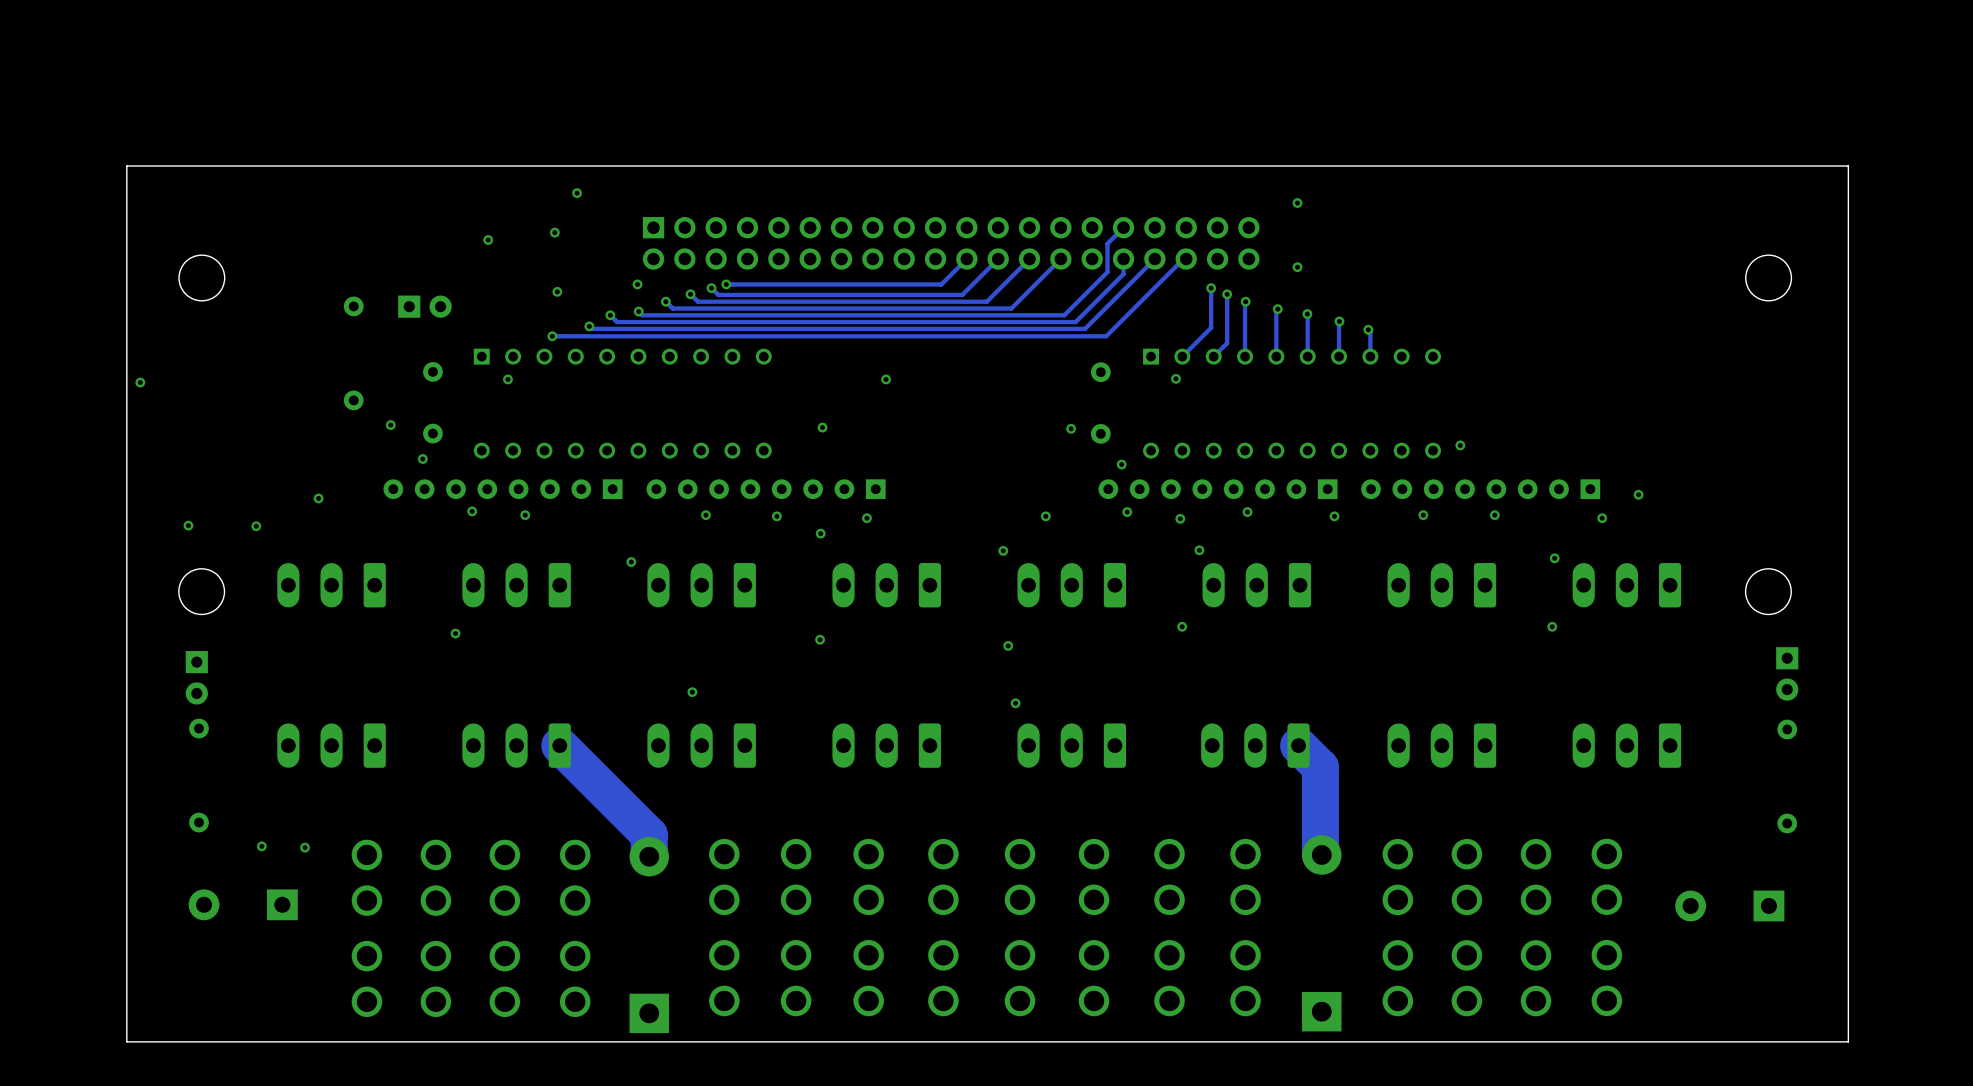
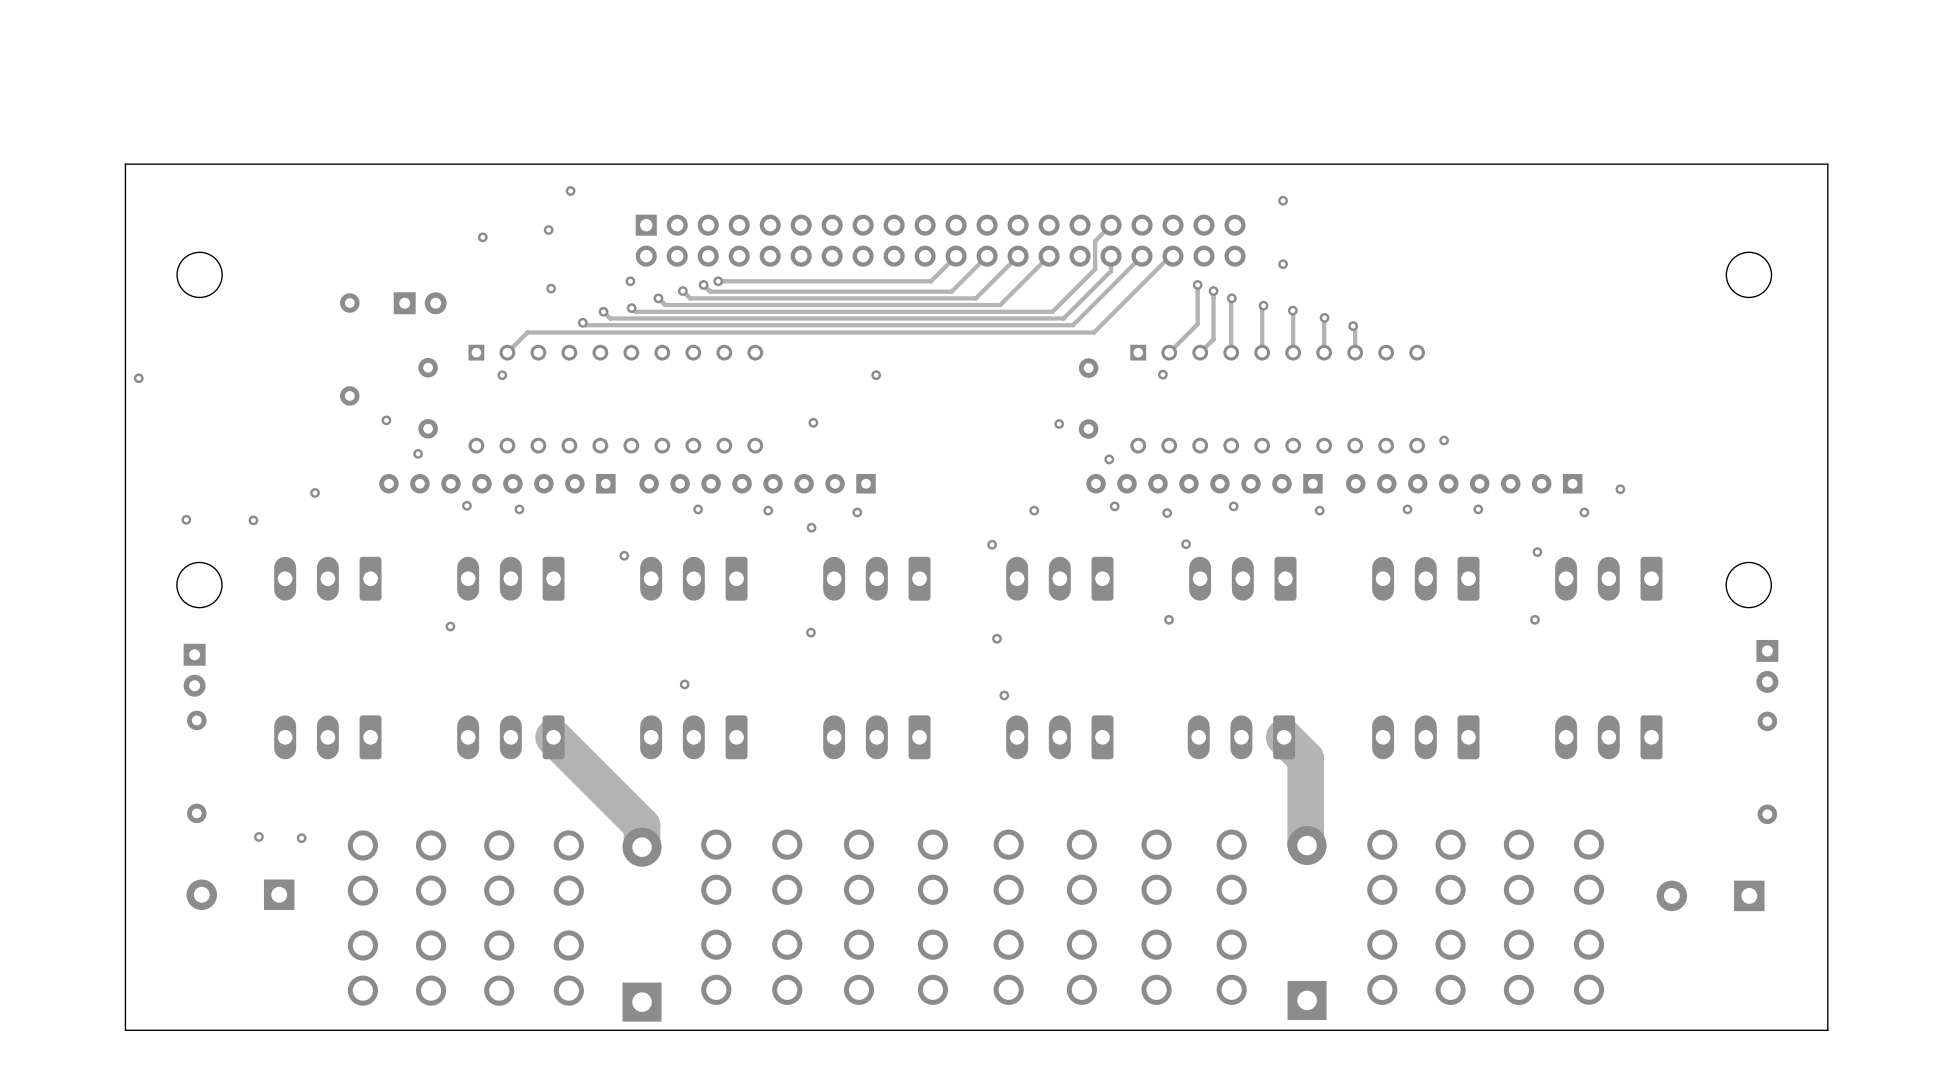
track: none -> (546, 332) (527, 332) (507, 352)
via: (552, 336) -> none

